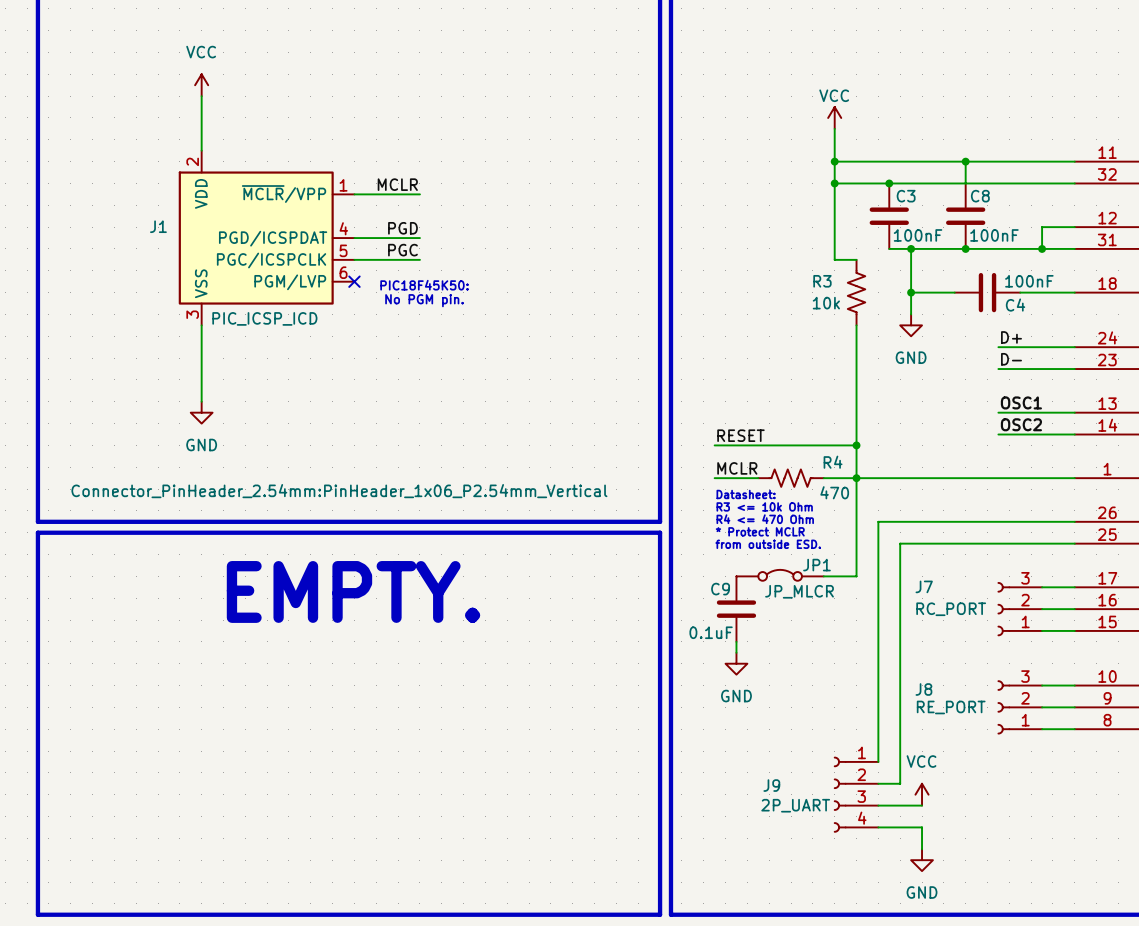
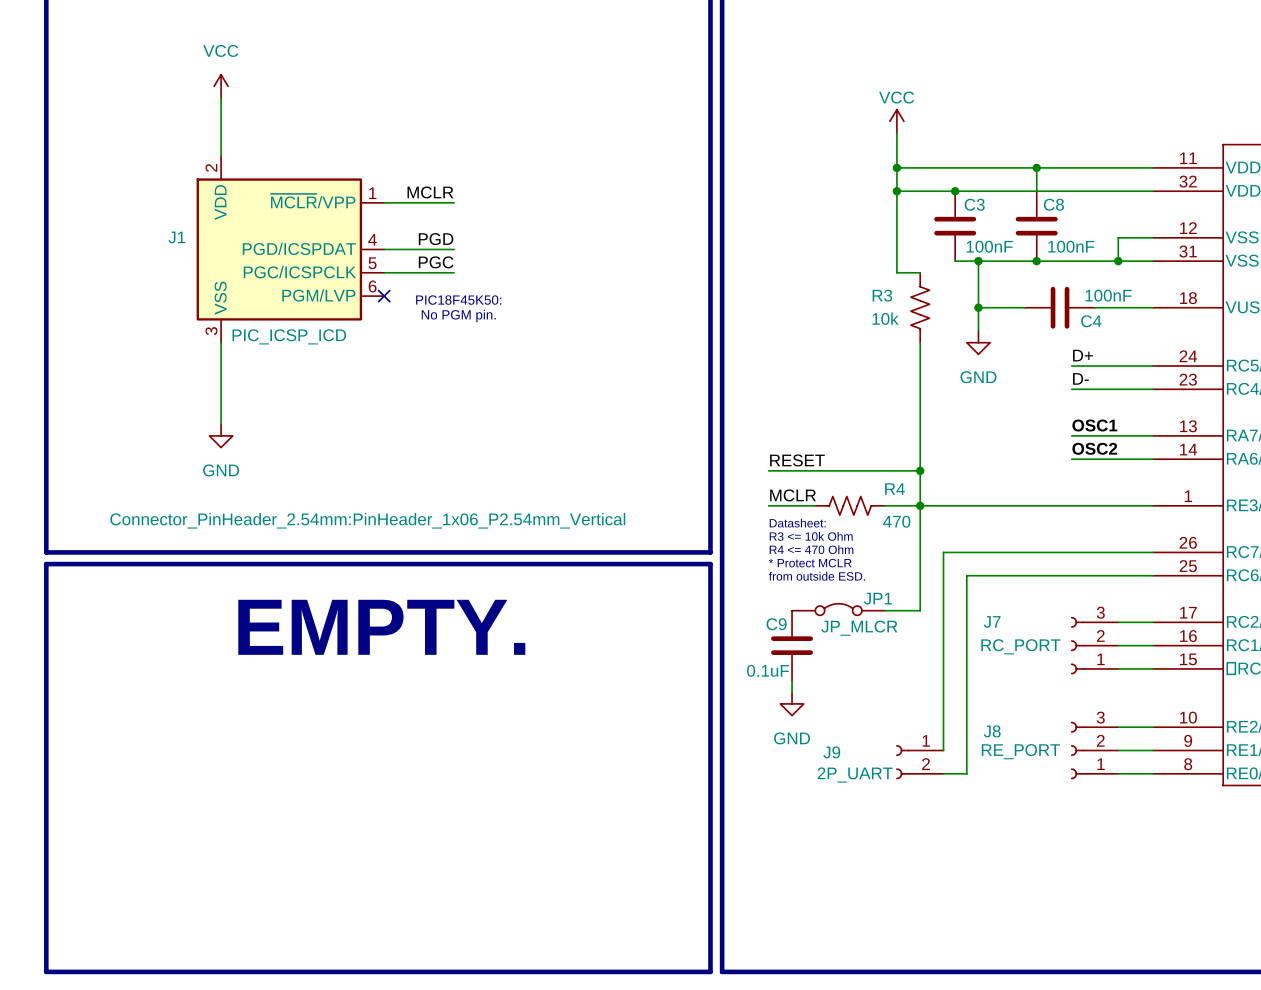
wire: (878, 707) (878, 761) -> none
wire: (900, 729) (900, 783) (878, 783) -> (966, 773) (943, 773)
J9 symbol: [834, 756, 879, 833] -> [896, 745, 944, 780]
power symbol: VCC (922, 794) -> none
wire: (878, 805) (922, 805) -> none
wire: (878, 827) (922, 827) (922, 849) -> none
power symbol: GND (922, 860) -> none

